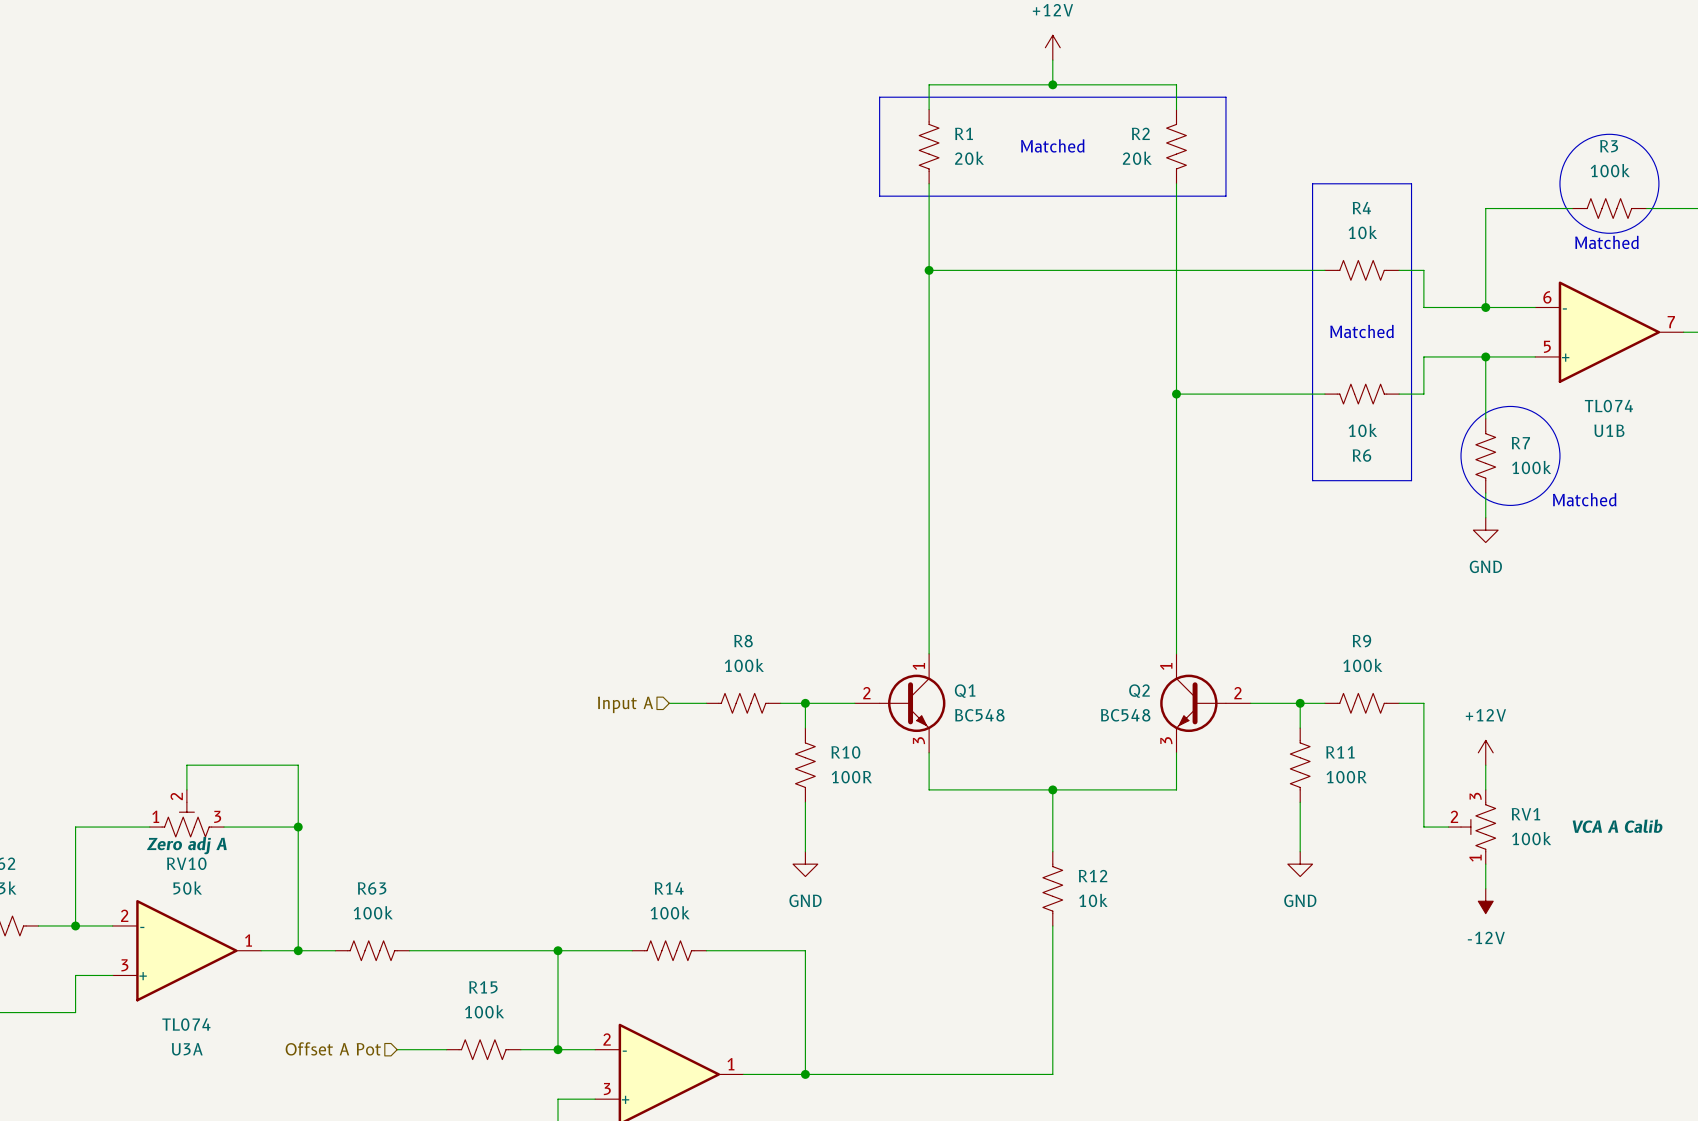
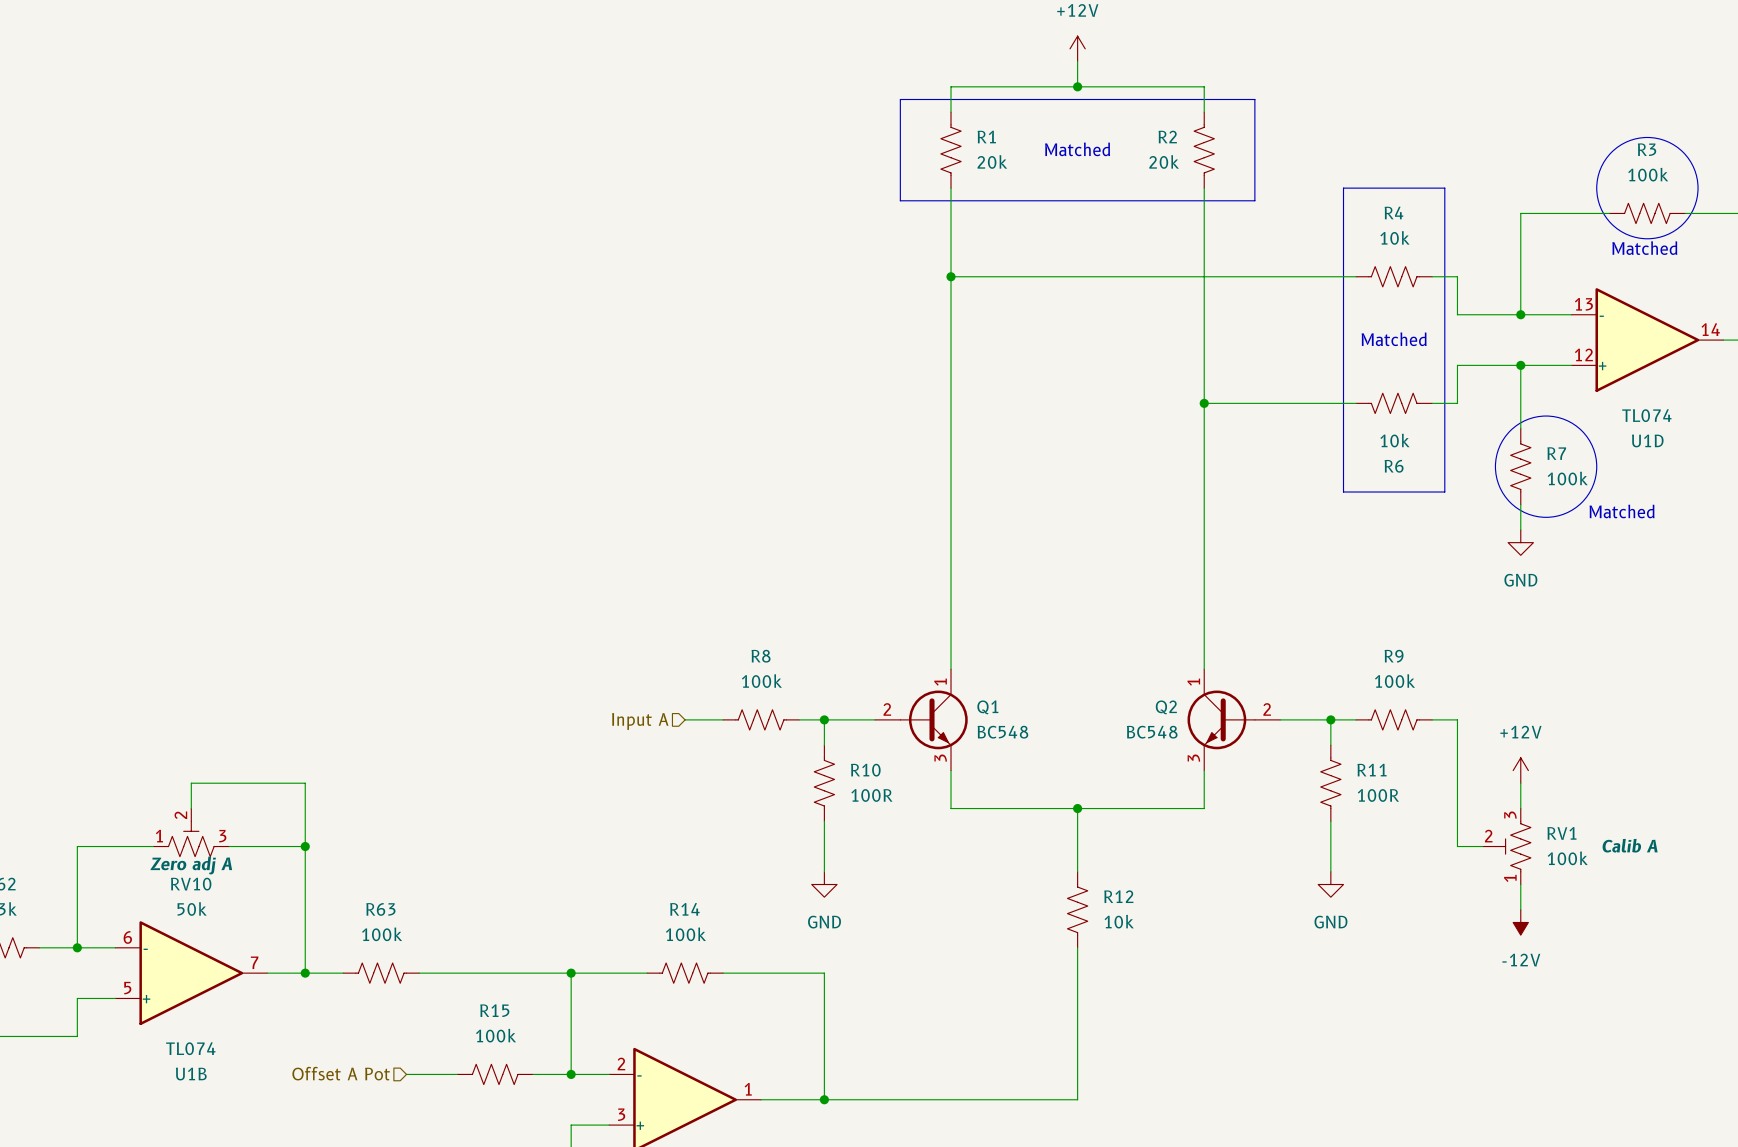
U1B position: (1609, 332) -> (191, 973)
U1D: none -> TL074 (1647, 340)
RV1 text: VCA A Calib (1617, 826) -> Calib A (1630, 845)
U3A: TL074 (186, 950) -> none

